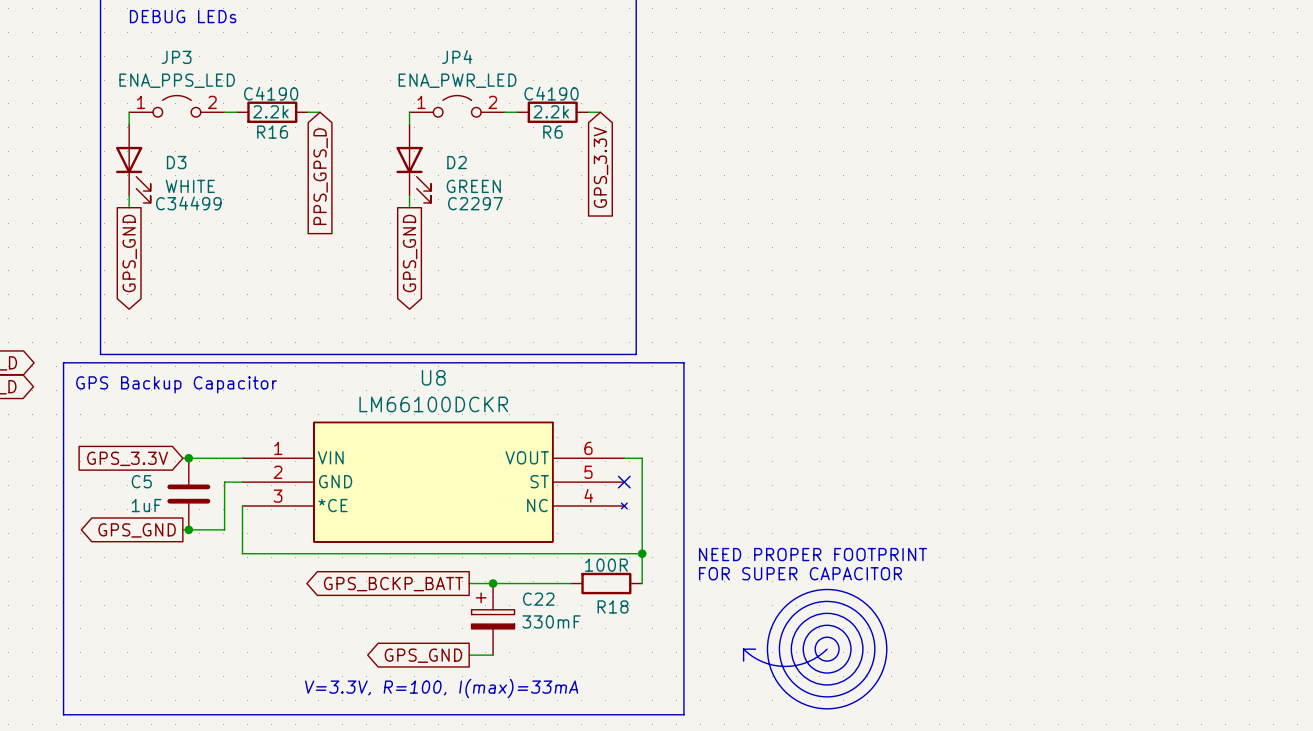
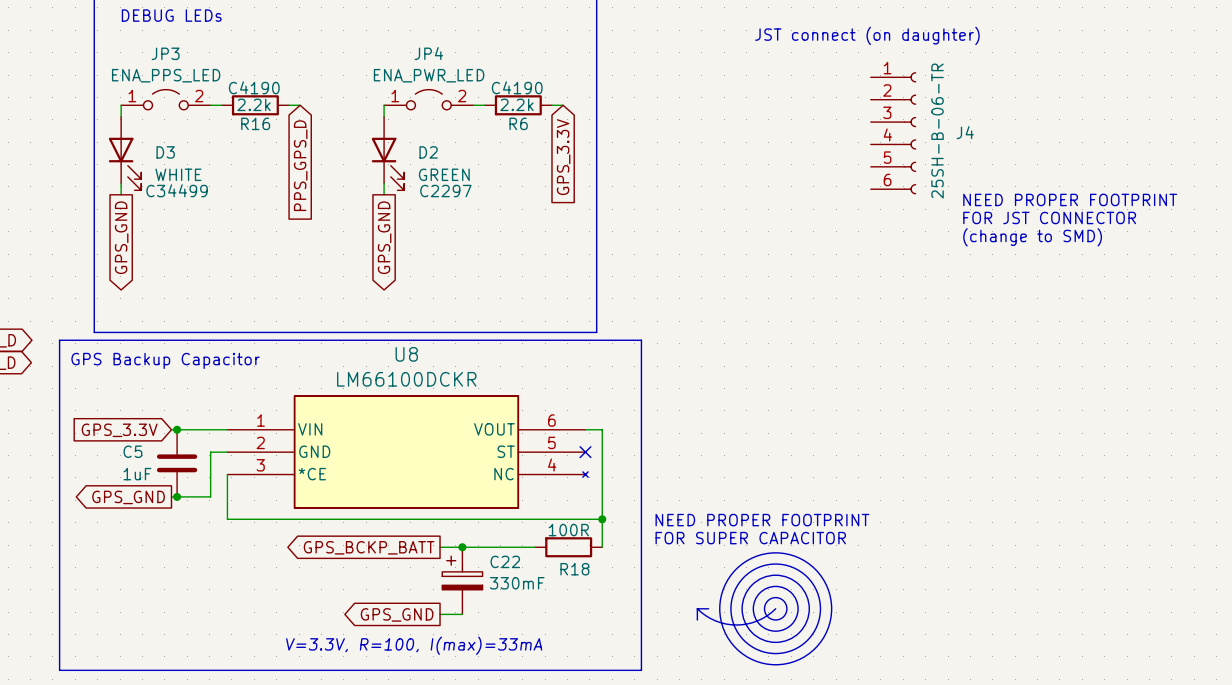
text: none -> JST connect (on daughter) (867, 35)
J4: none -> 25SH-B-06-TR (893, 133)
text: none -> NEED PROPER FOOTPRINT (1070, 199)
text: none -> FOR JST CONNECTOR (1049, 217)
text: none -> (change to SMD) (1032, 237)

